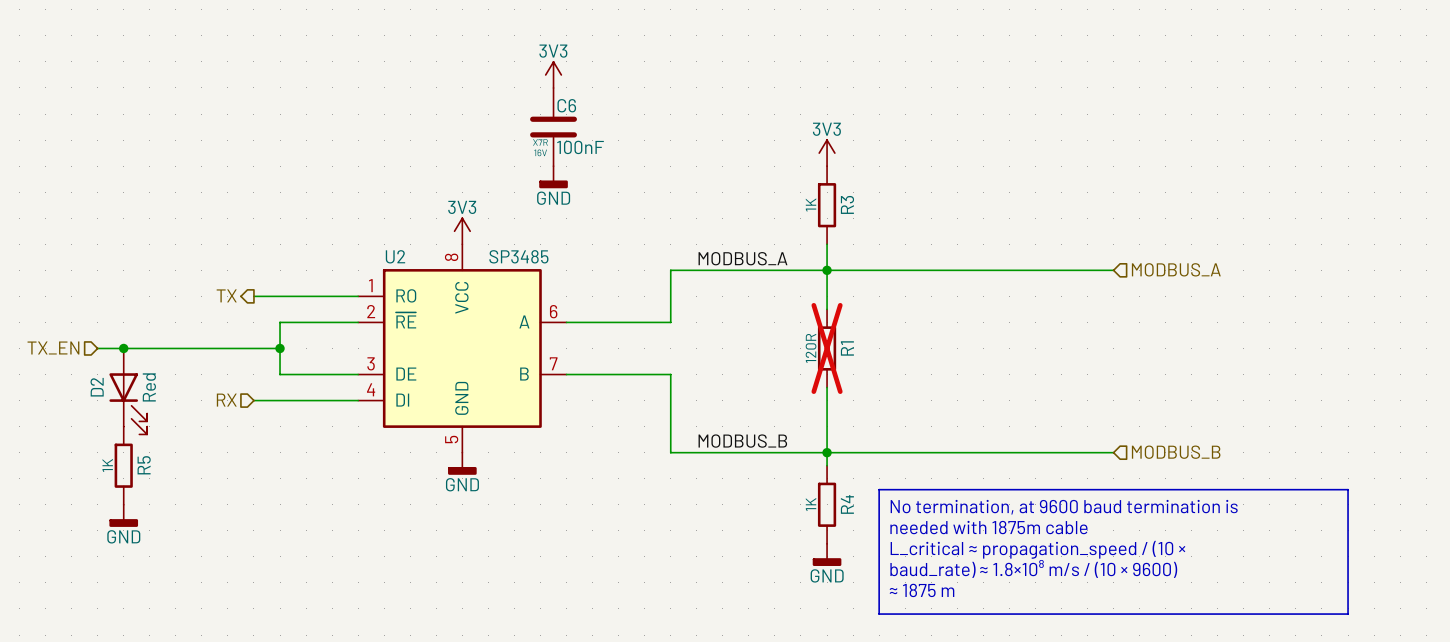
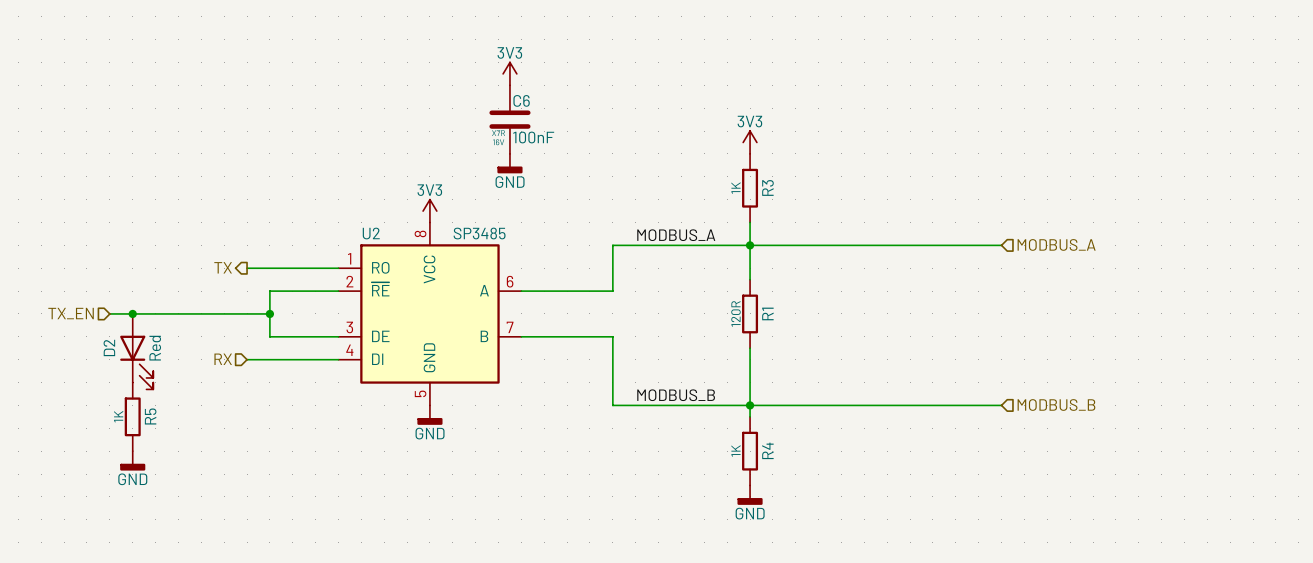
R1 do-not-place cross: (827, 348) -> none
line: (879, 489) (1348, 489) (1348, 614) (879, 614) (879, 489) -> none
text: No termination, at 9600 baud termination is (1064, 507) -> none
text: needed with 1875m cable (988, 527) -> none
text: L_critical ≈ propagation_speed / (10 × (1037, 549) -> none
text: baud_rate) ≈ 1.8×10⁸ m/s / (10 × 9600) (1033, 568) -> none
text: ≈ 1875 m (921, 590) -> none

